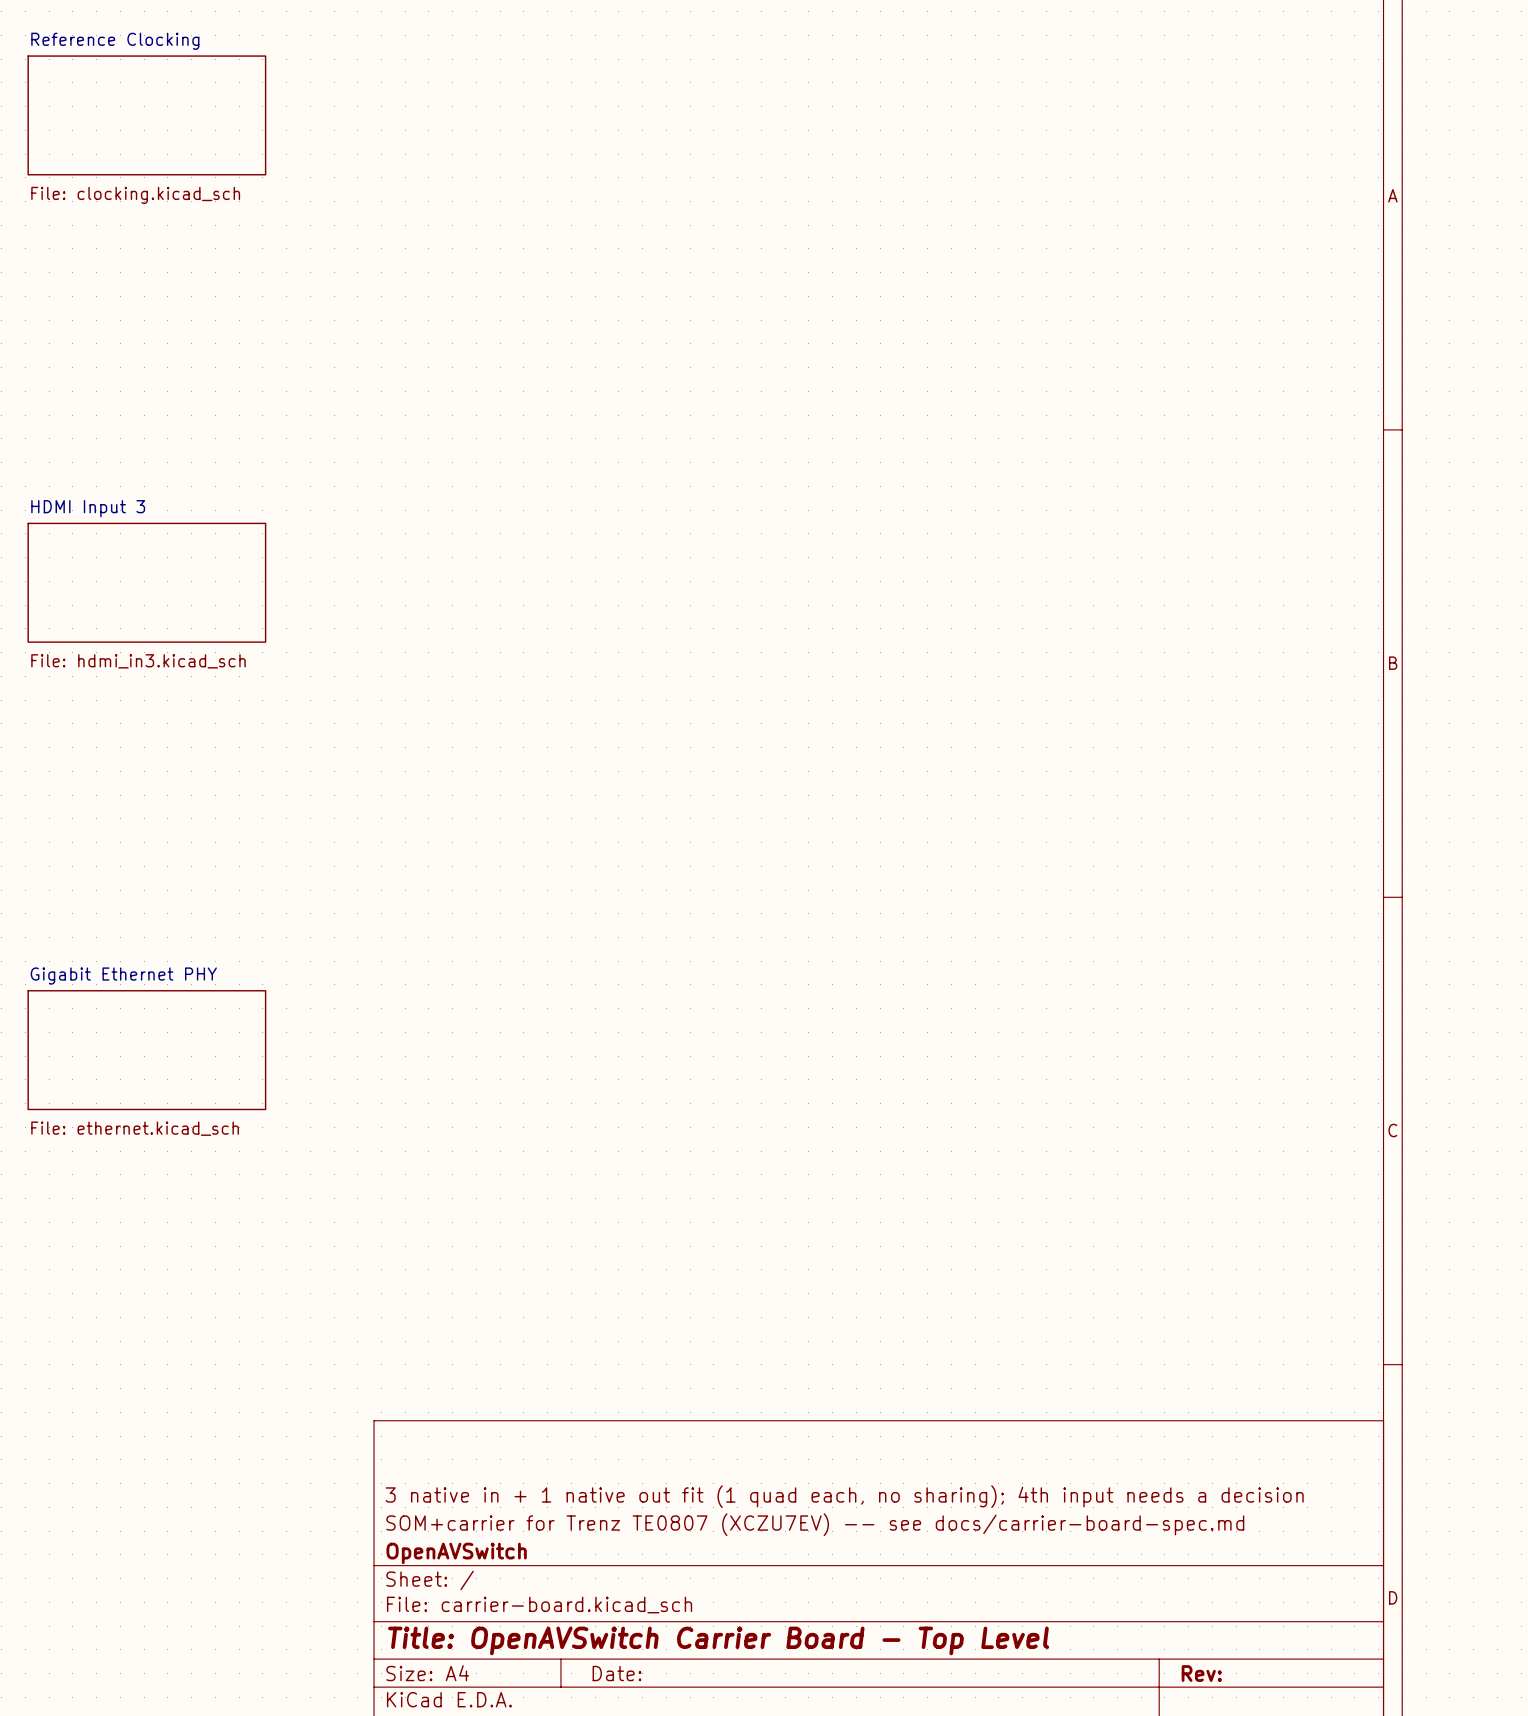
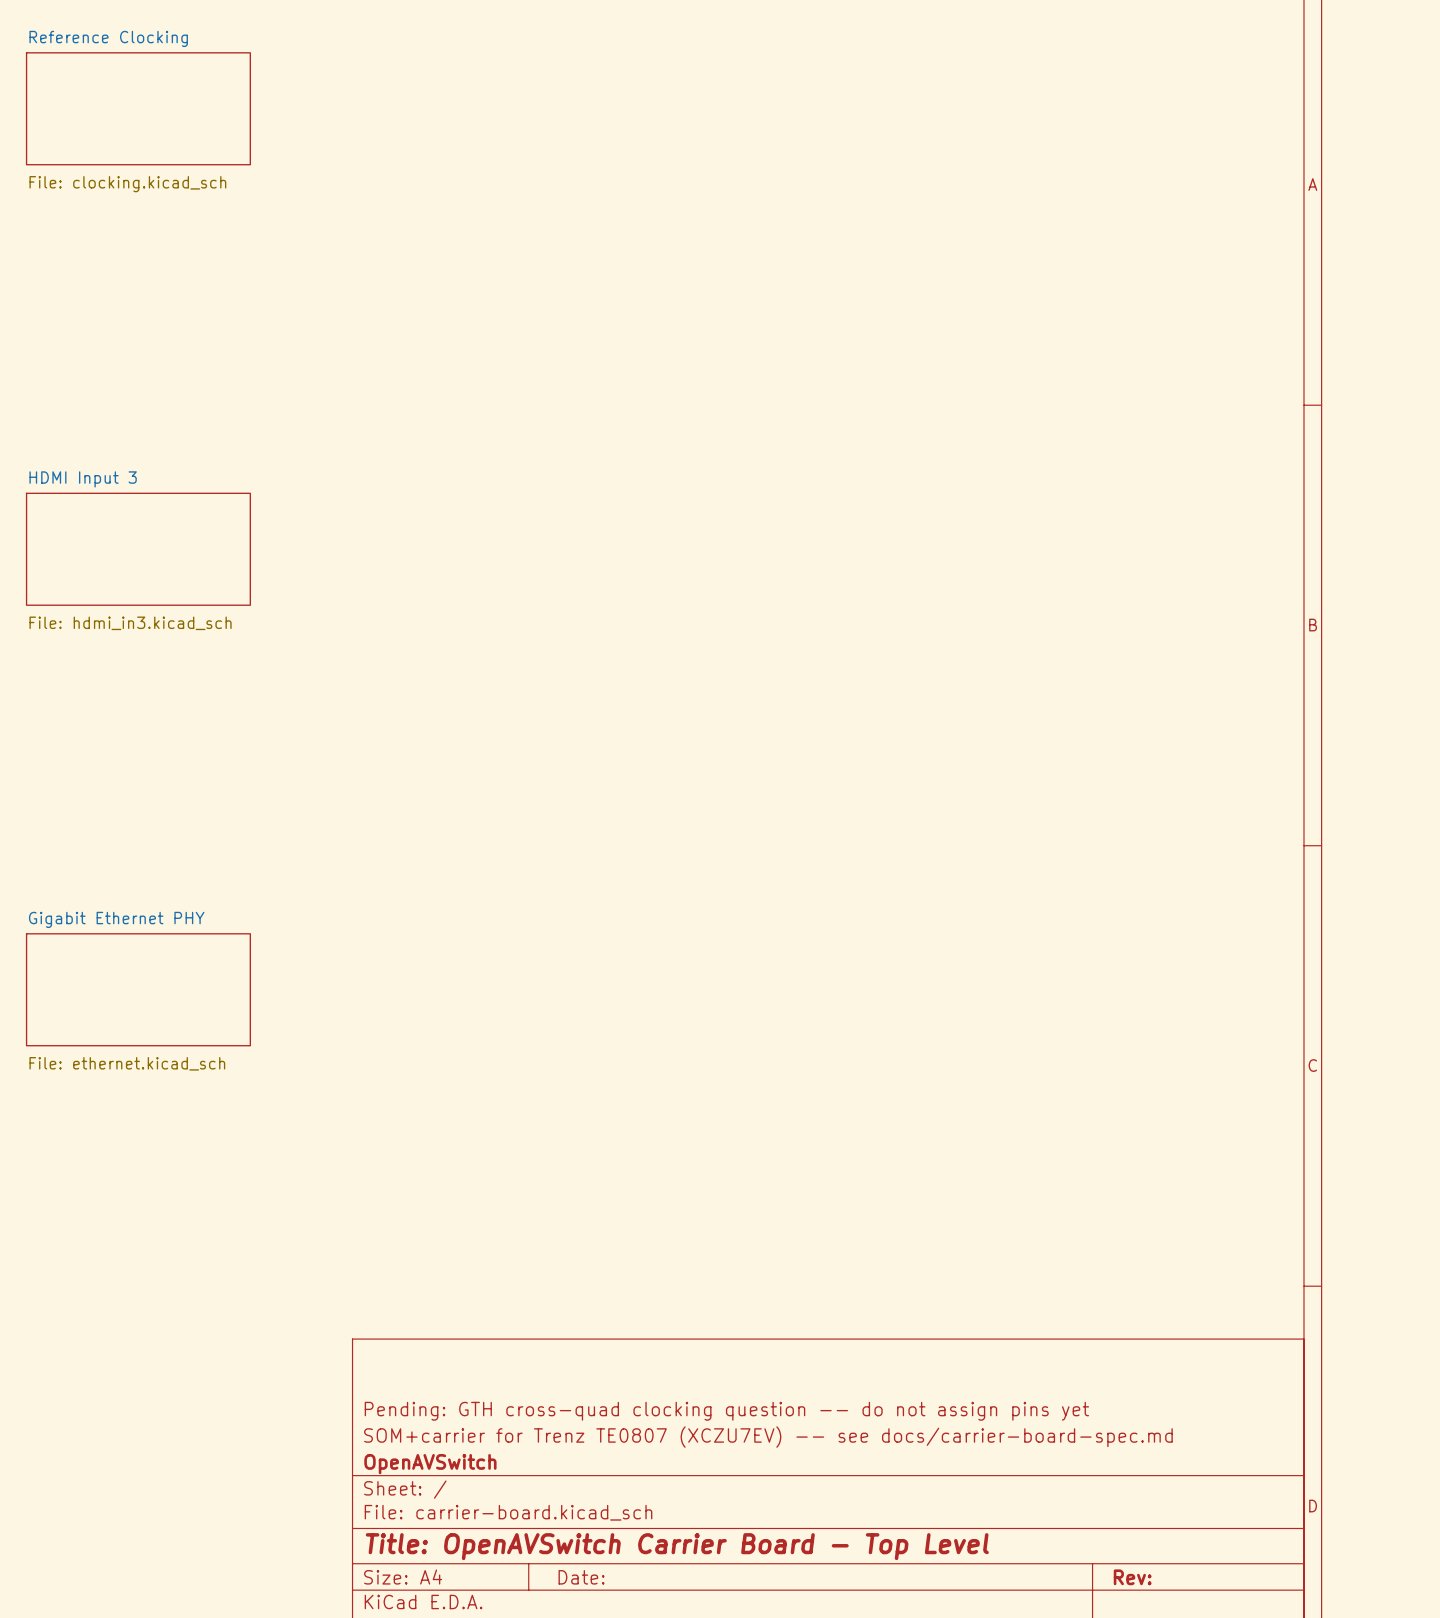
title block: 3 native in + 1 native out fit (1 quad each, no sharing); 4th input needs a decision (844, 1496) -> Pending: GTH cross-quad clocking question -- do not assign pins yet (726, 1411)

